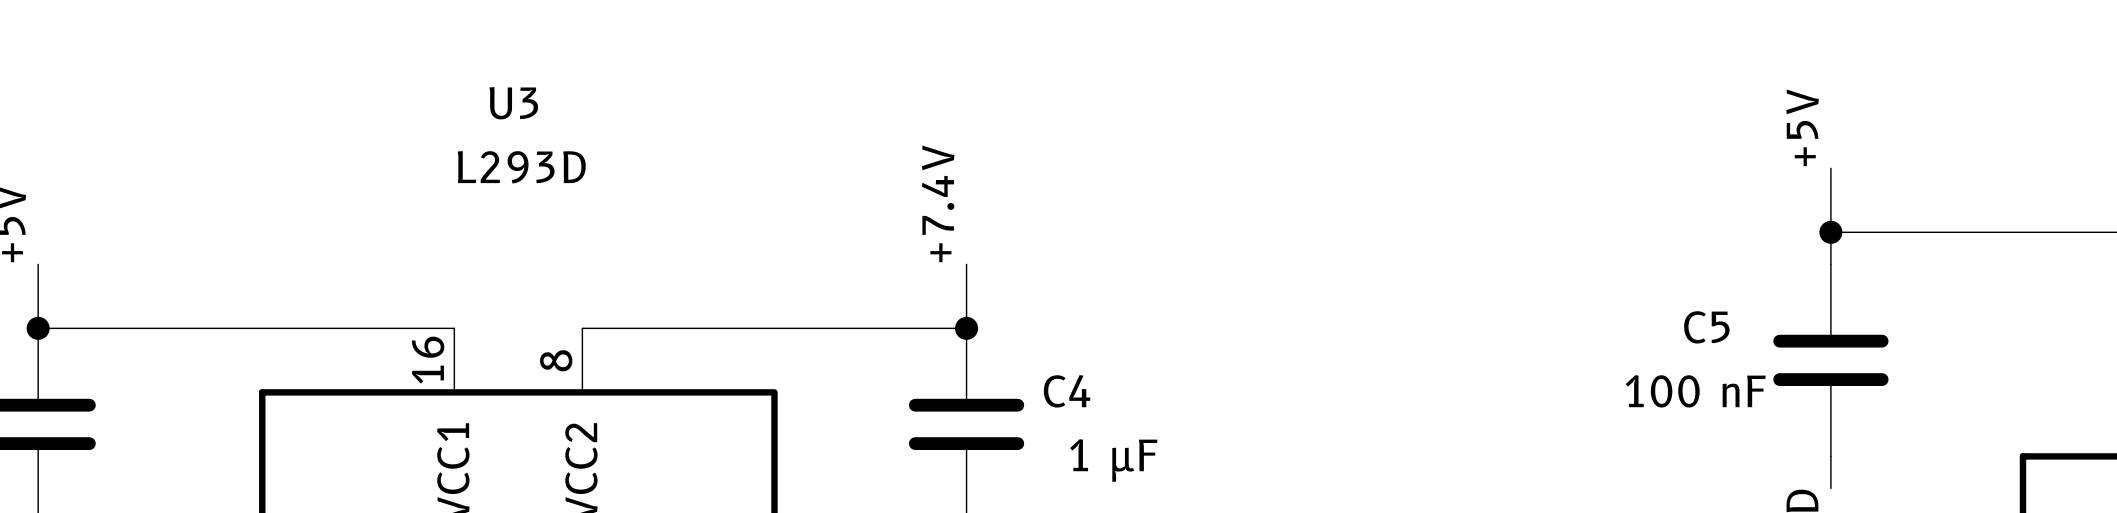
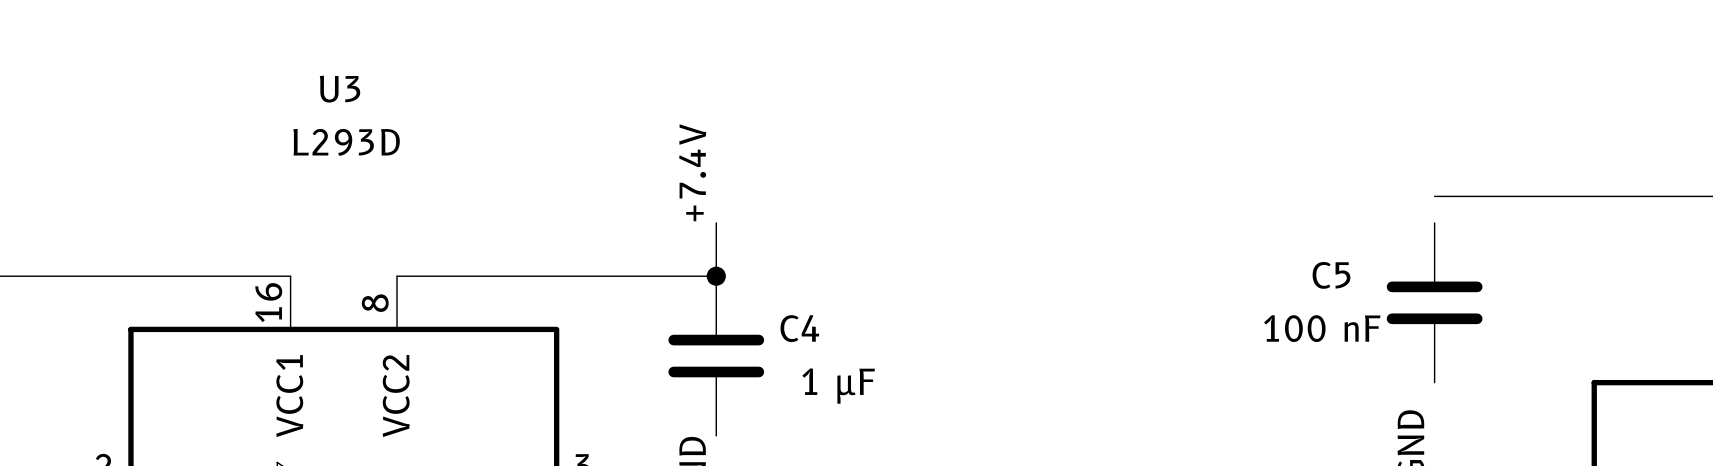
label: +5V (1802, 127) -> none
wire: (1830, 168) (1830, 264) -> none
junction: (1830, 232) -> none
wire: (1830, 456) (1830, 488) -> none

